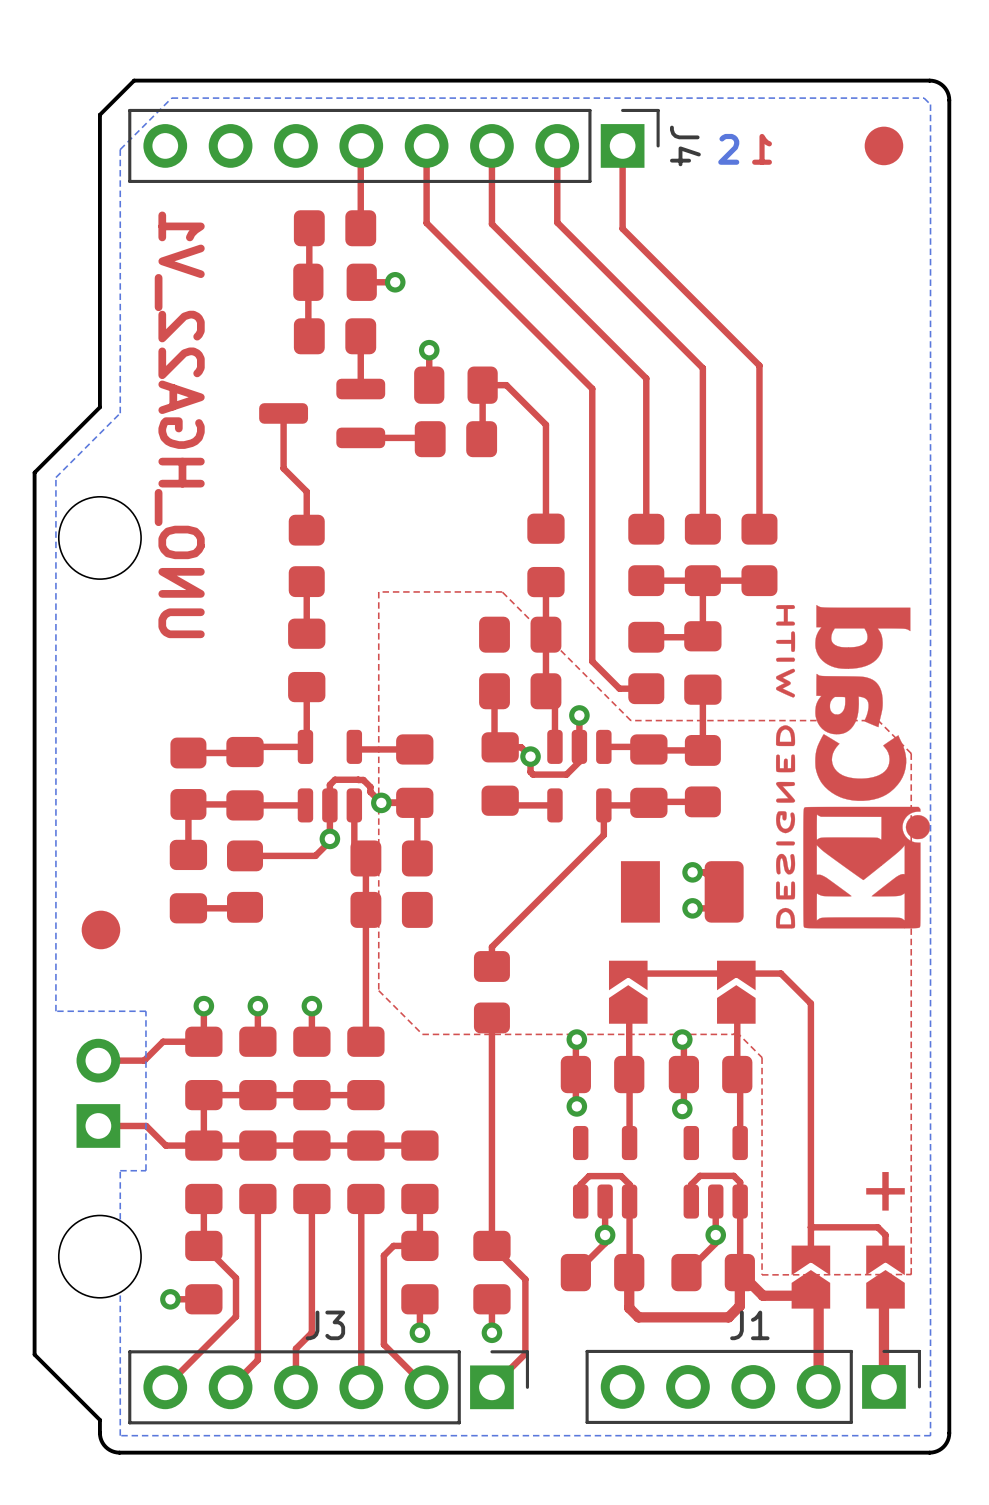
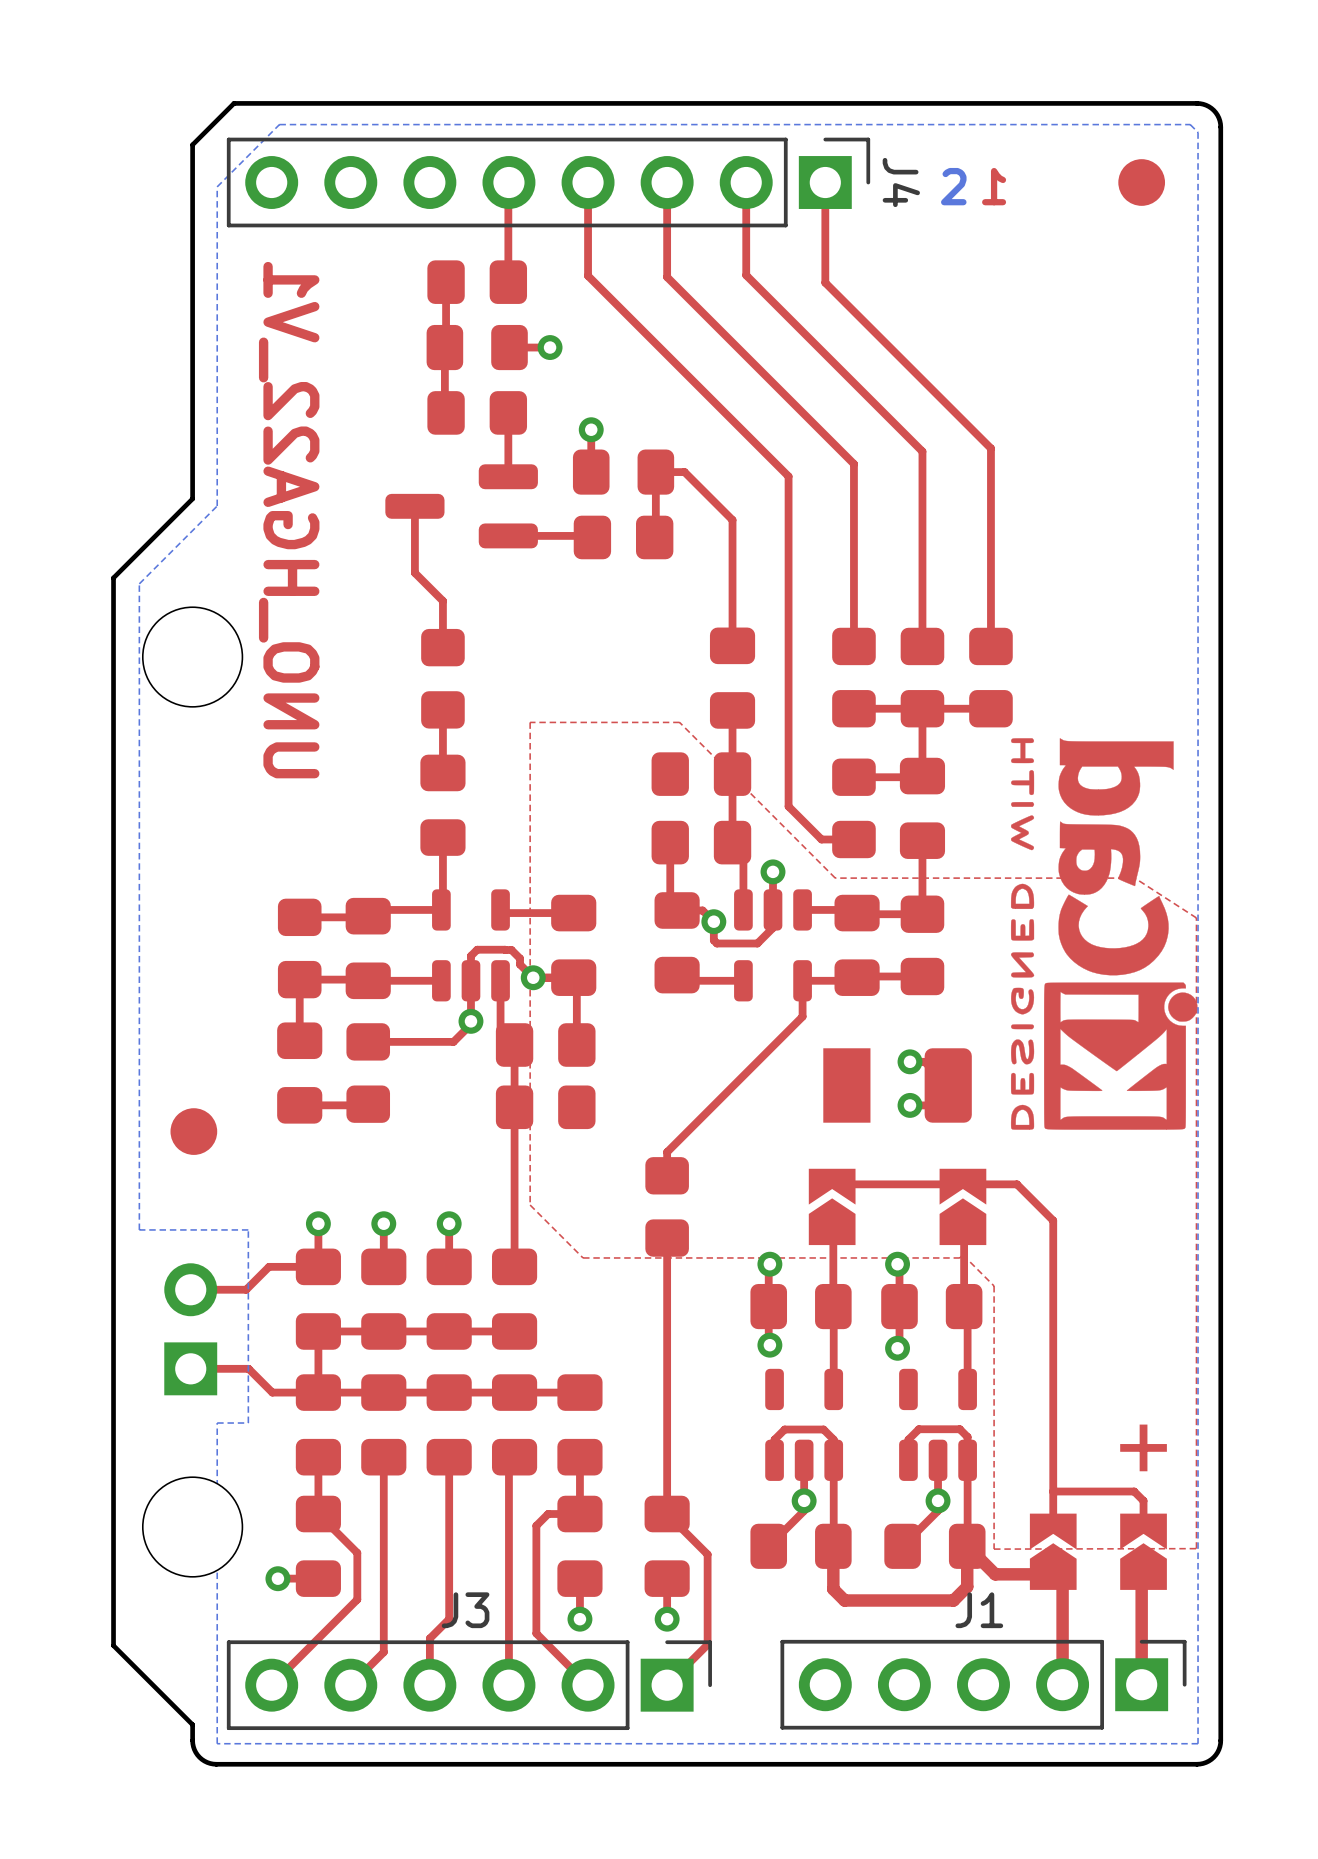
top zone outline: (878, 720) (911, 753) (911, 1274) (762, 1274) -> (1134, 878) (1196, 917) (1196, 1548) (994, 1549)

